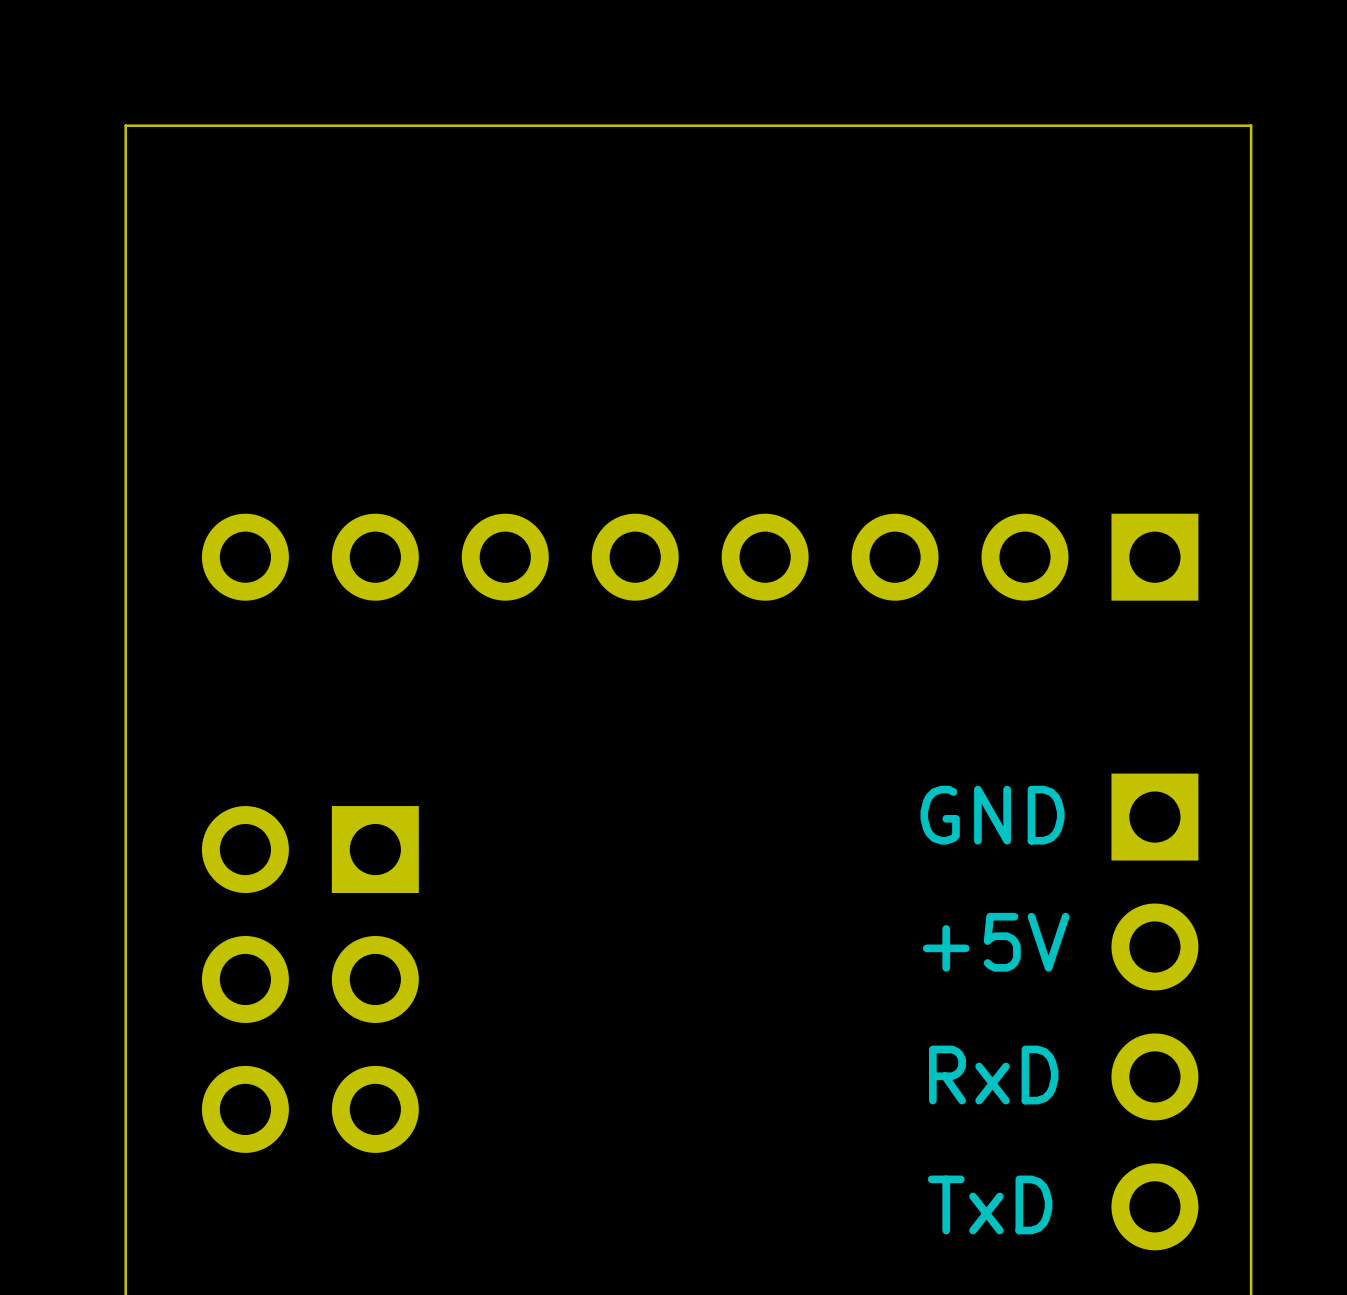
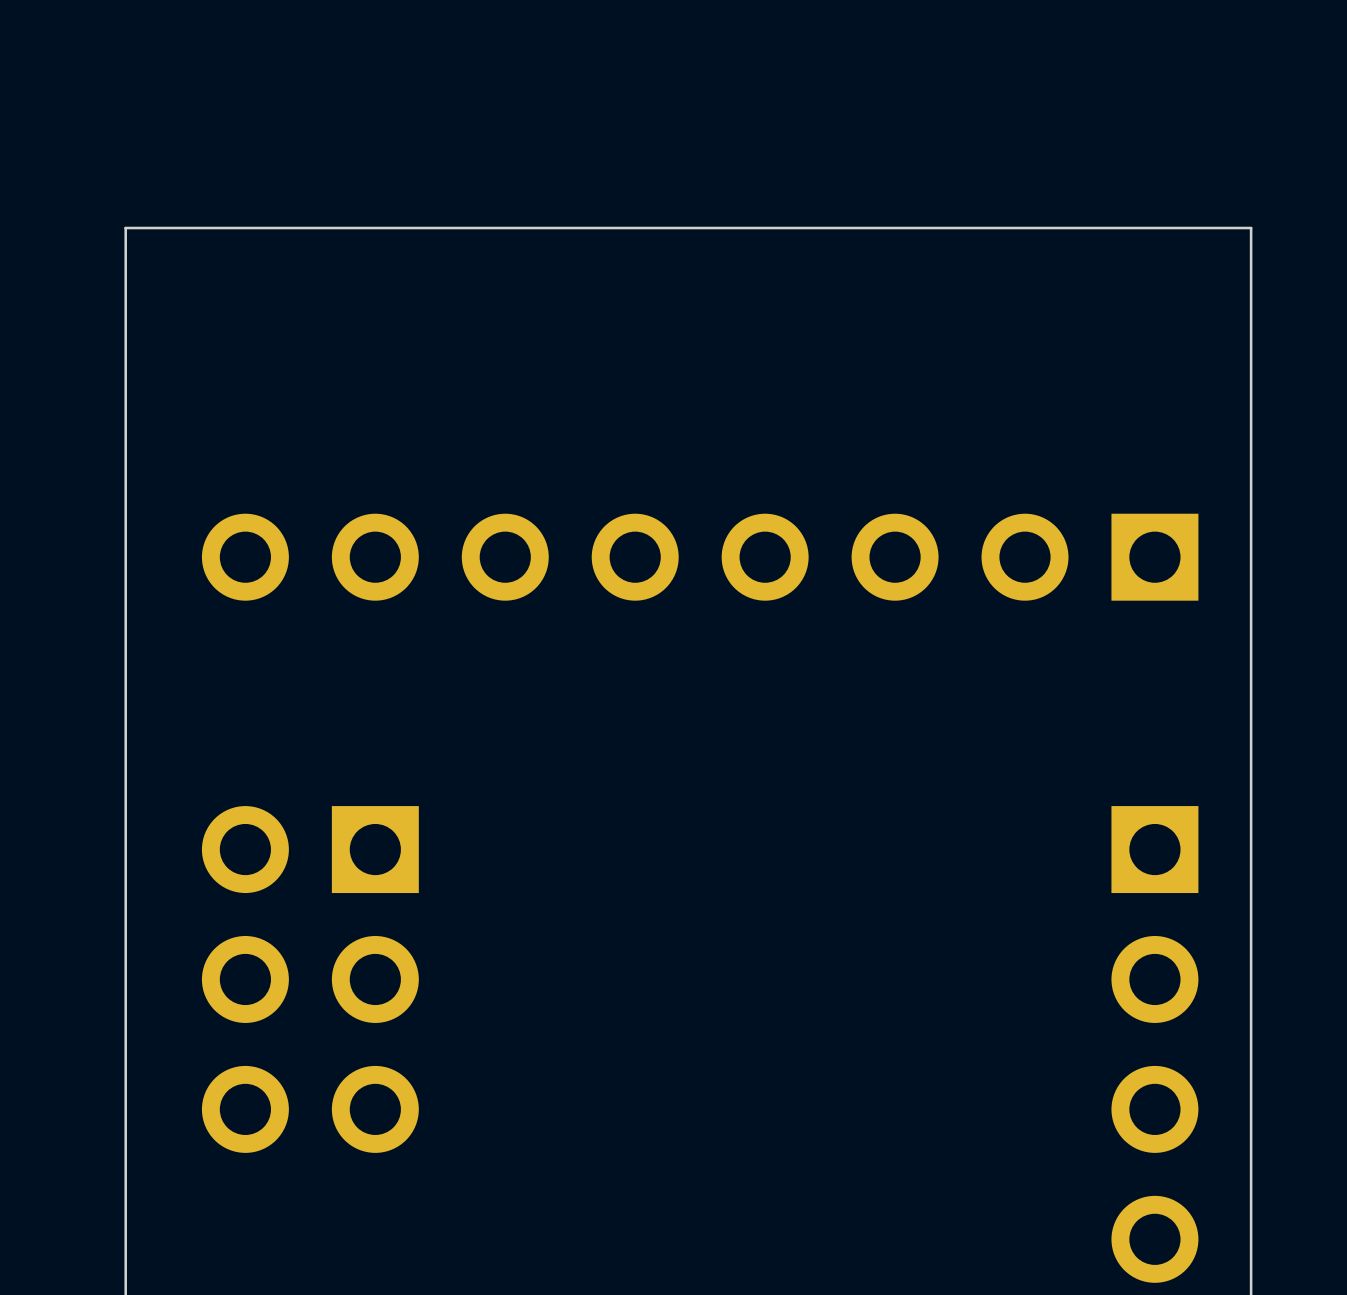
board edge: (1251, 228) (1251, 125) (125, 125) (125, 228) -> (1251, 228) (125, 228)
text: GND (992, 815) -> none
text: +5V (996, 942) -> none
part position: (1154, 1011) -> (1154, 1044)
text: RxD (993, 1075) -> none
text: TxD (990, 1204) -> none

